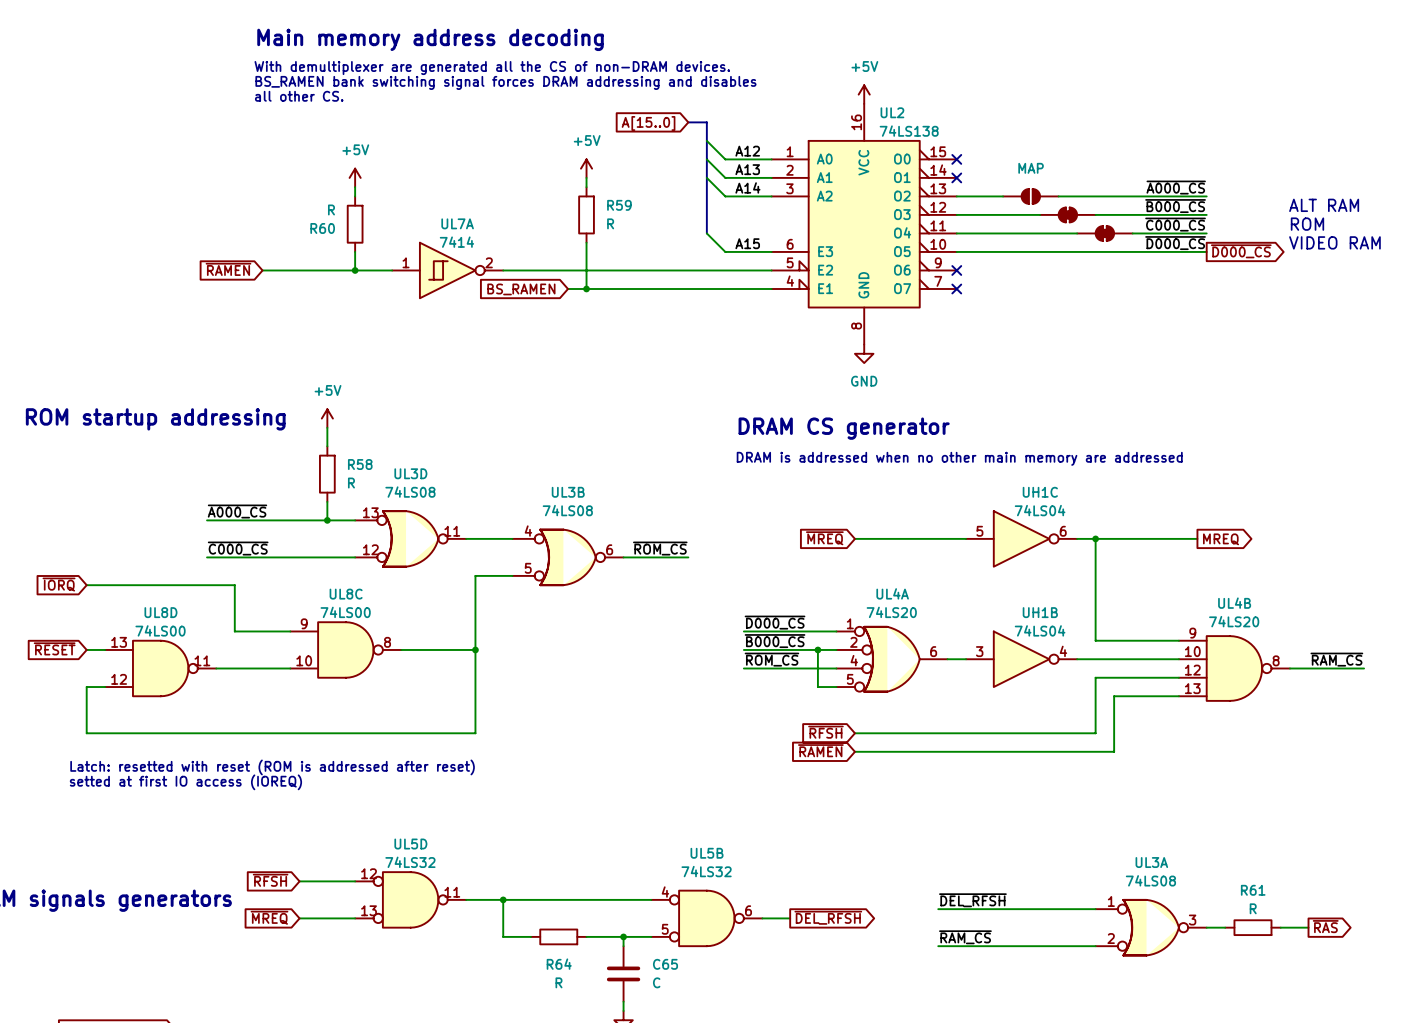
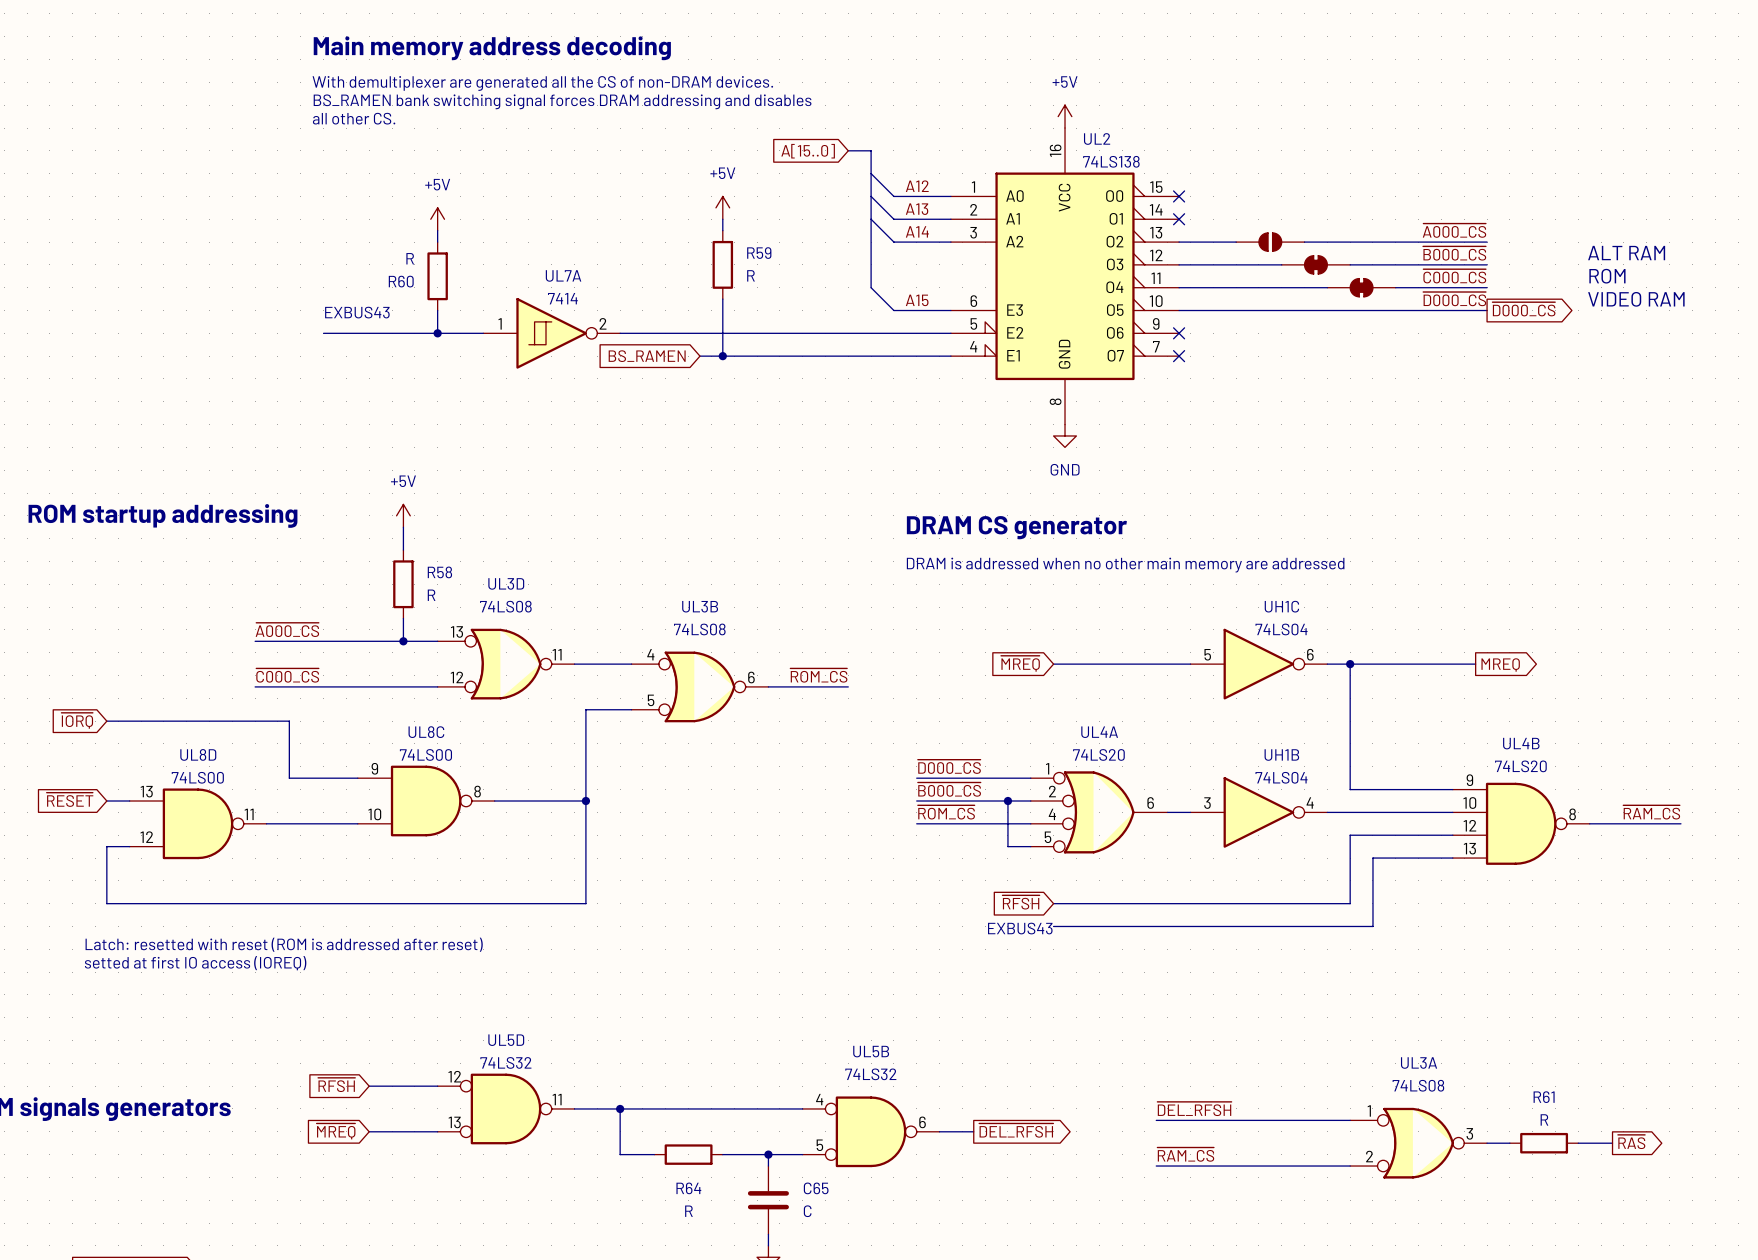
part value: MAP (1031, 168) -> none
text: none -> EXBUS43 (357, 312)
global label: ~{RAMEN} (228, 269) -> none
global label: ~{RAMEN} (820, 750) -> none
text: none -> EXBUS43 (1020, 928)

